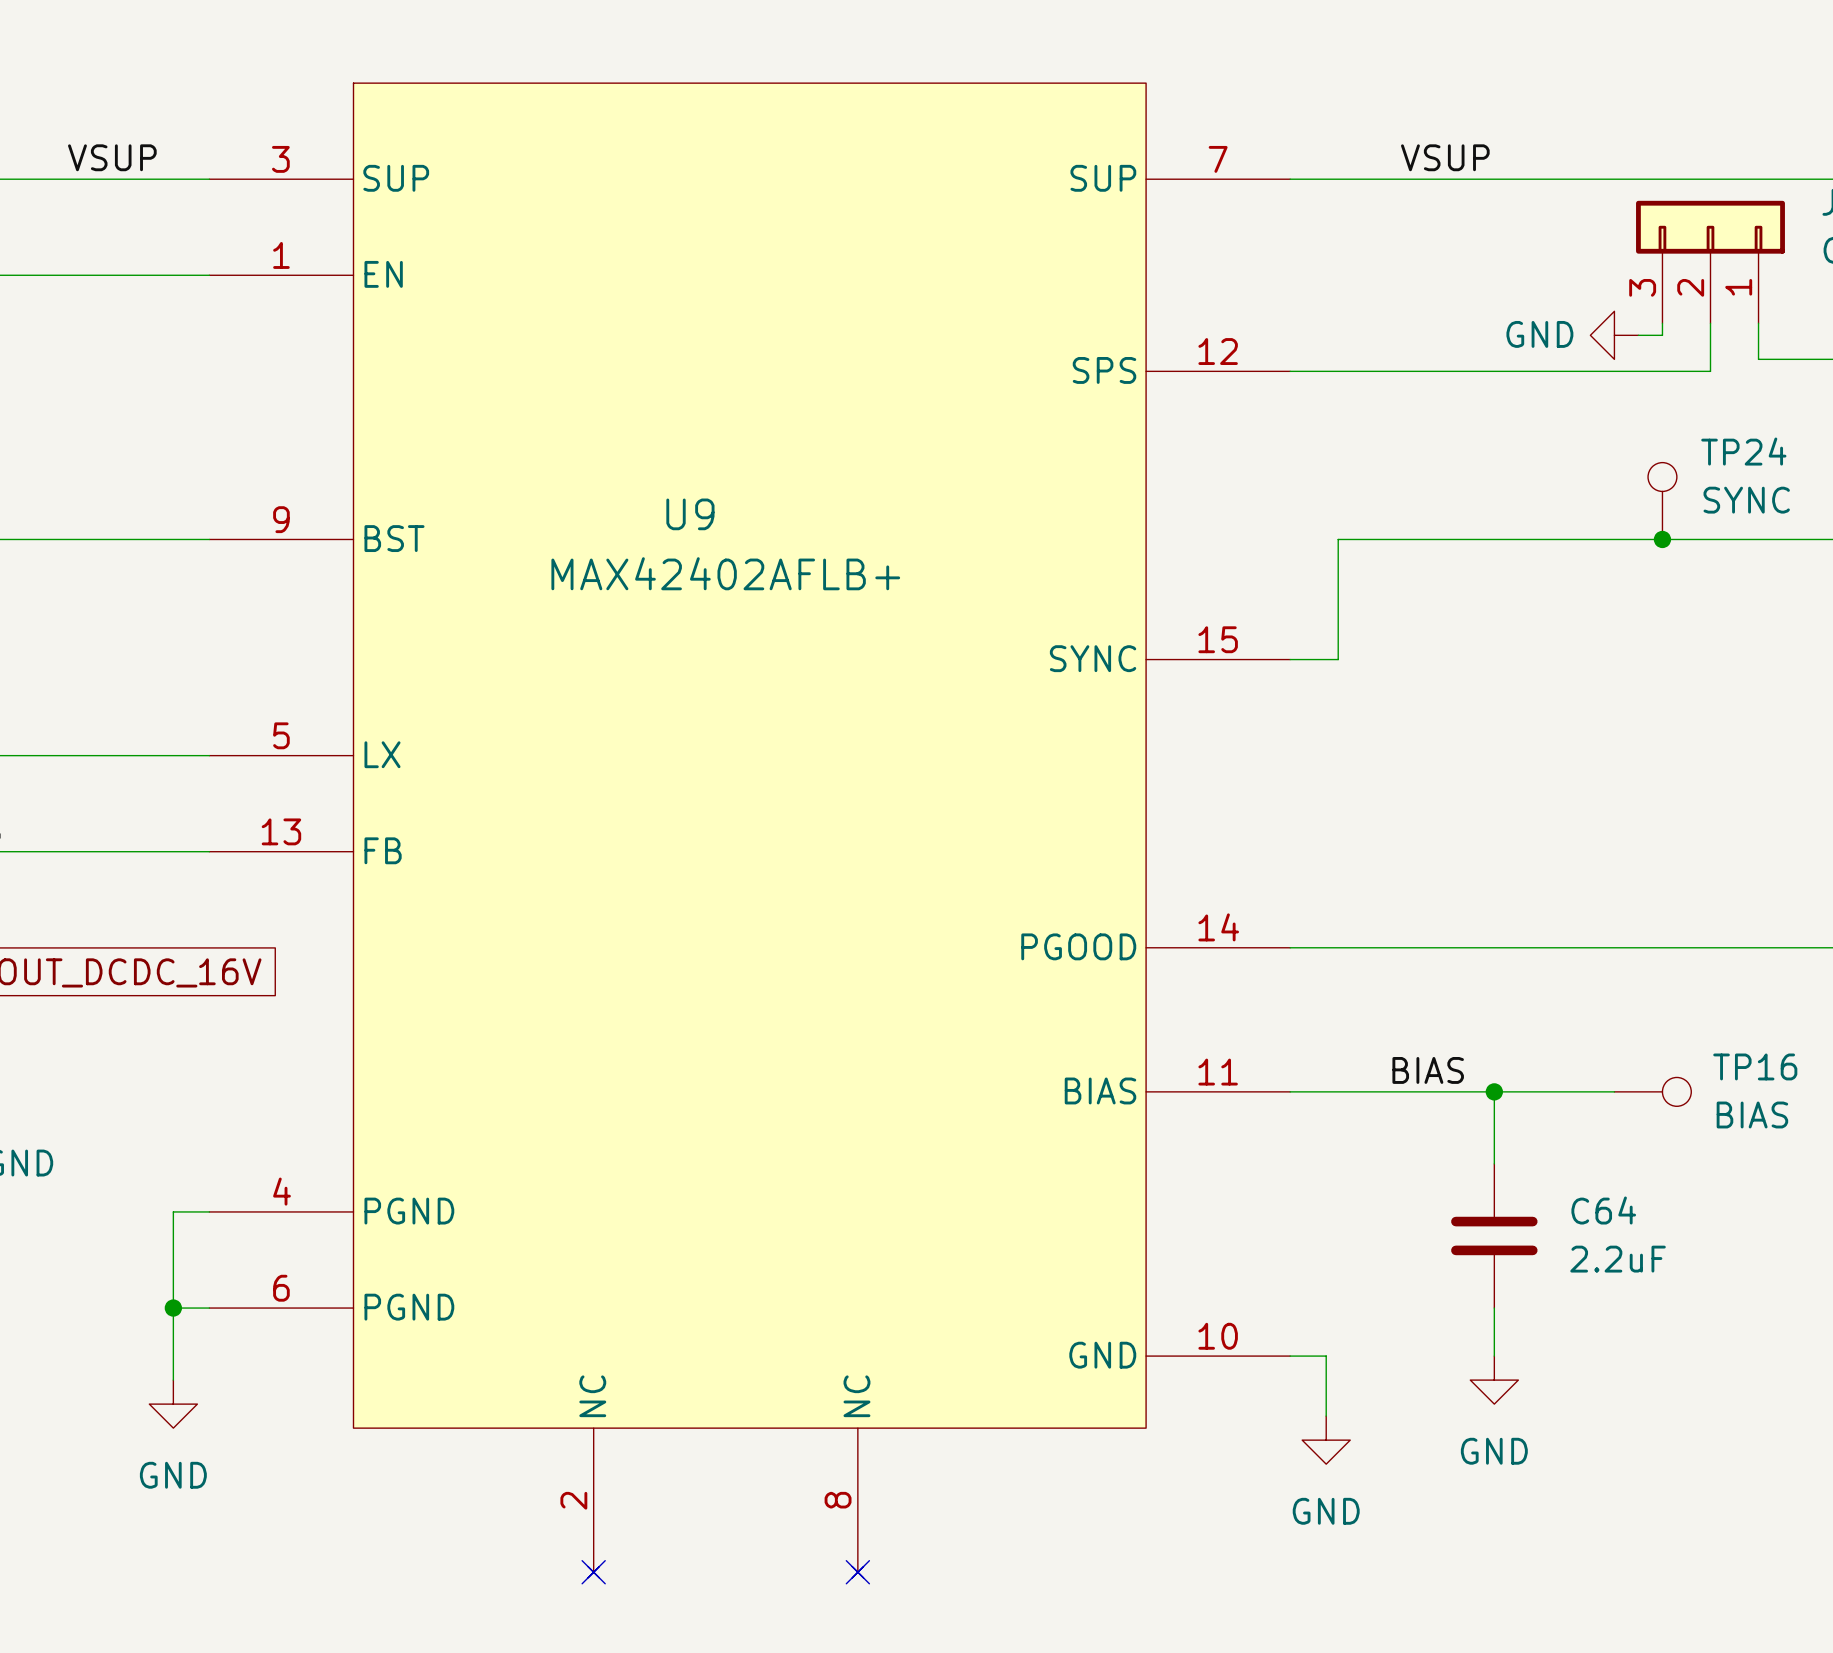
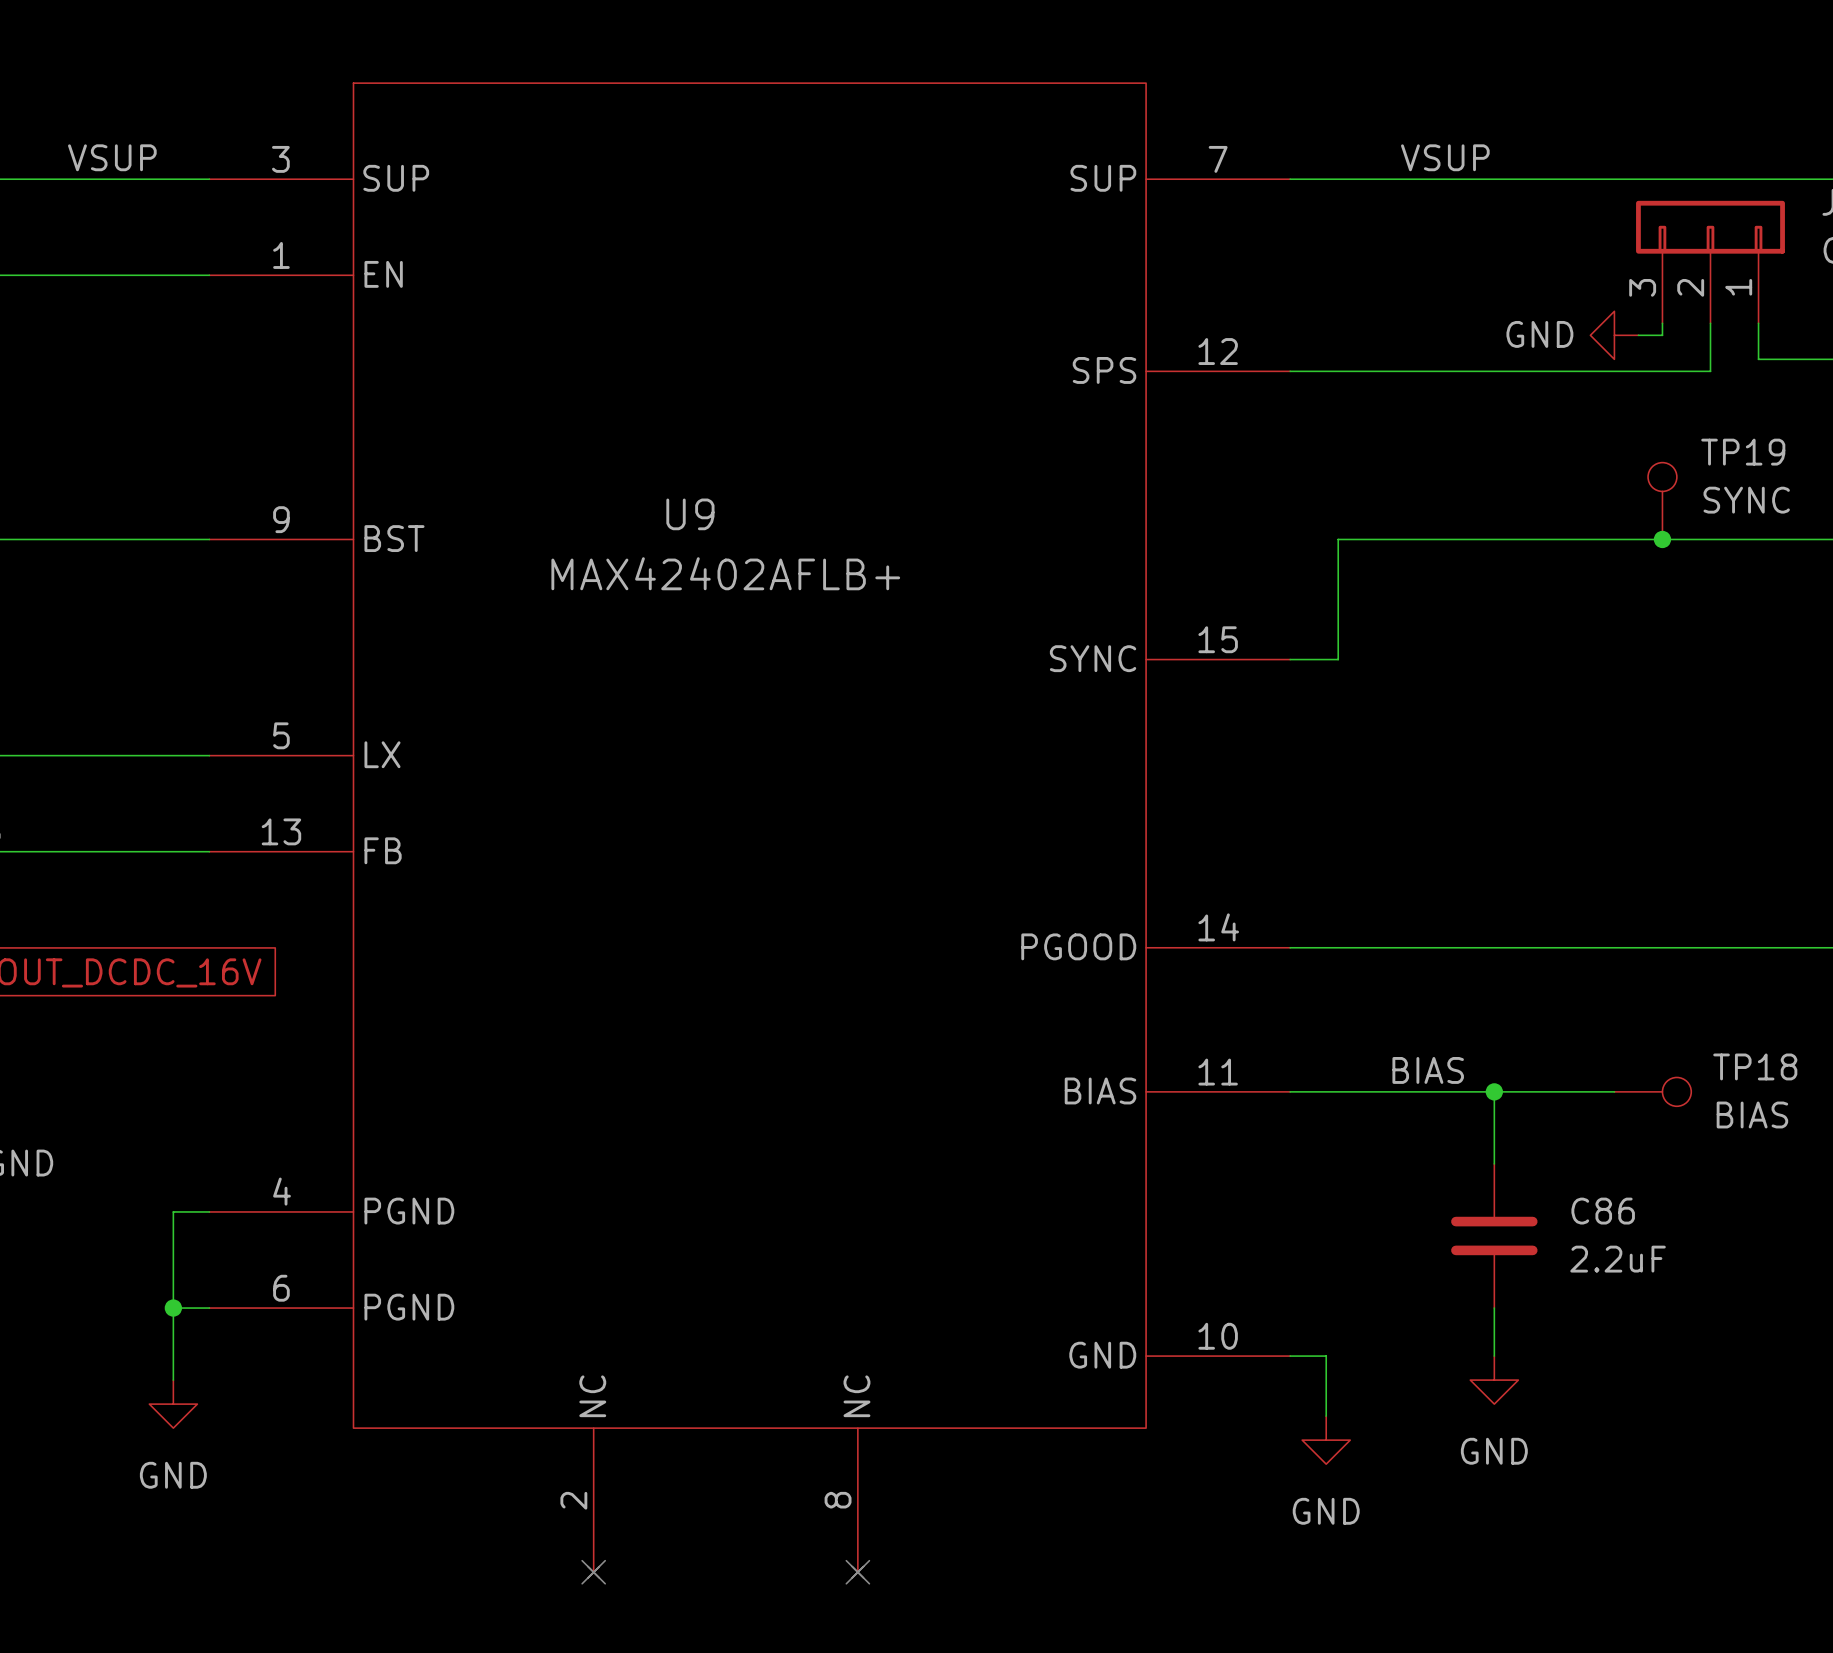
TP24 name: TP24 (1743, 451) -> TP19 (1743, 452)
TP16 name: TP16 (1755, 1066) -> TP18 (1755, 1066)
C64 name: C64 (1603, 1210) -> C86 (1603, 1211)

